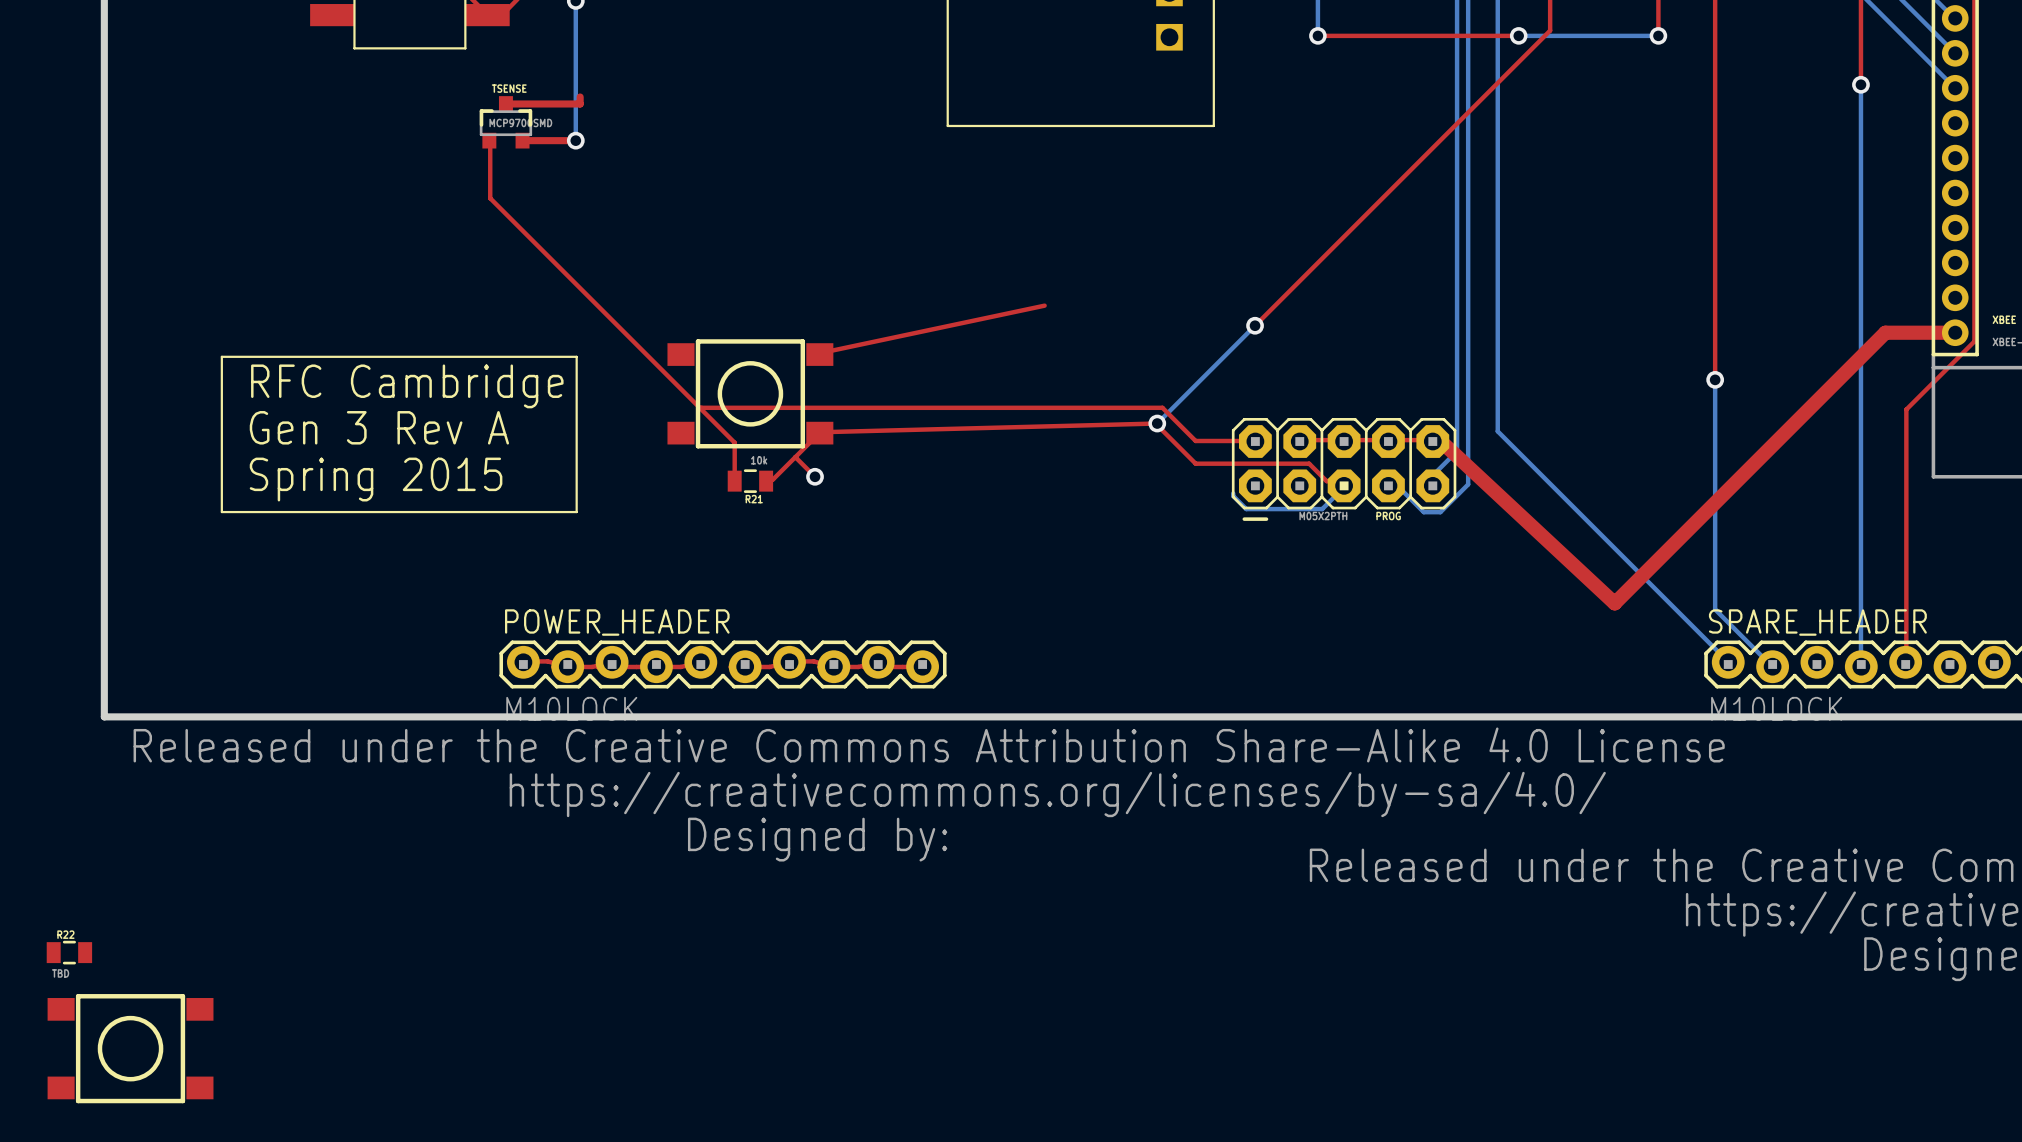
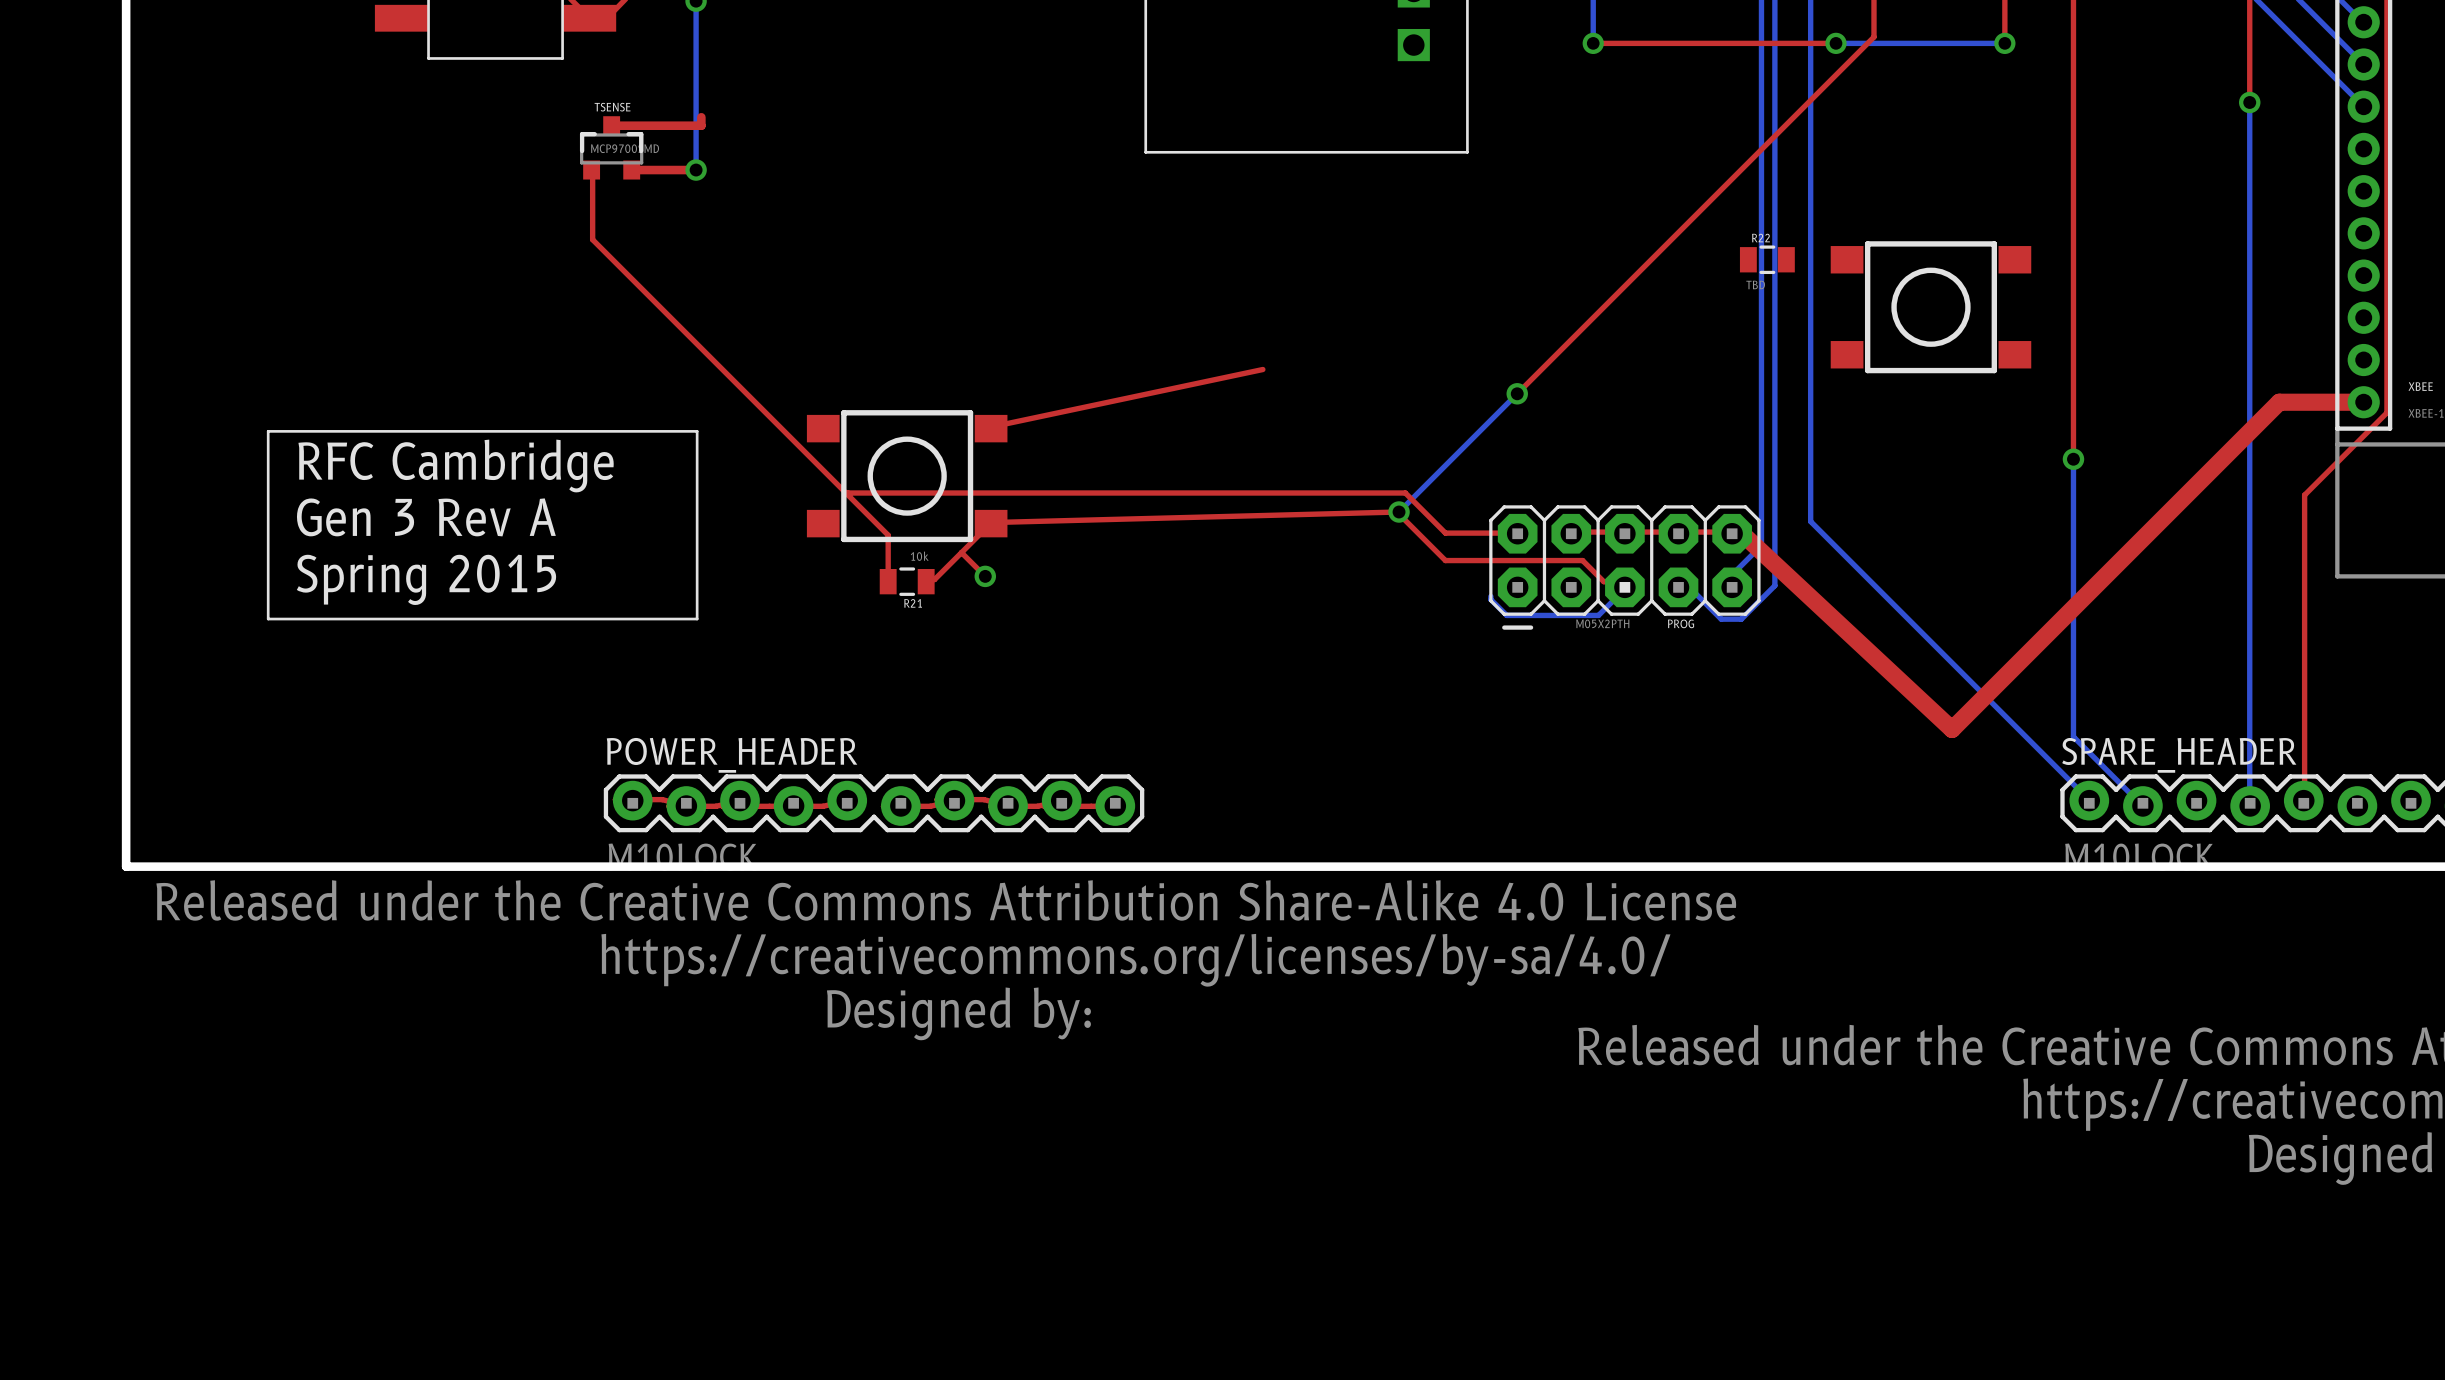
part: none -> (1930, 307)
R22 position: (69, 952) -> (1767, 259)
part: (130, 1048) -> none

